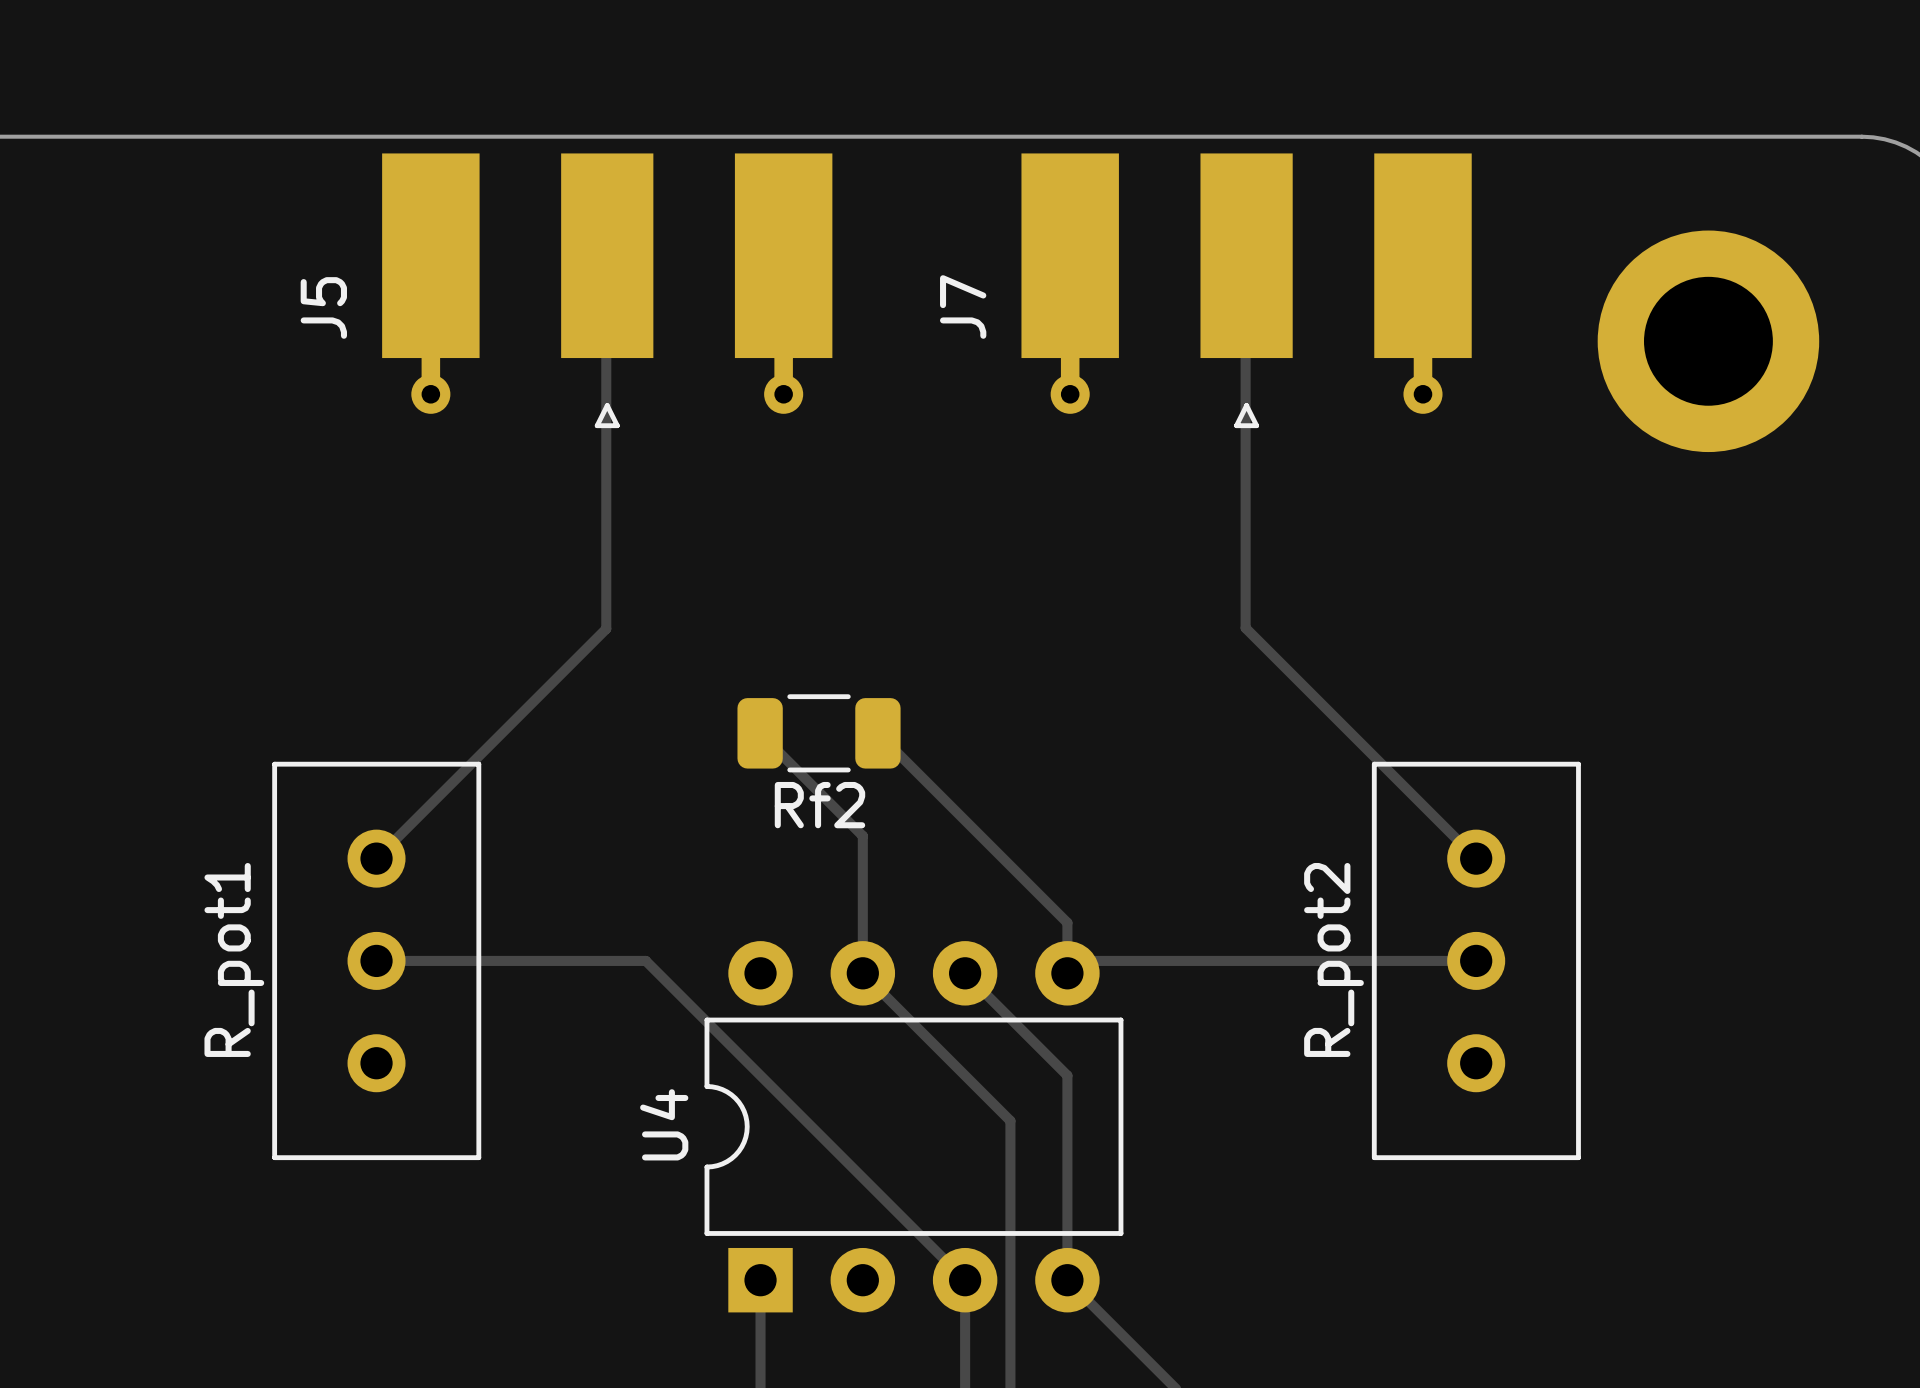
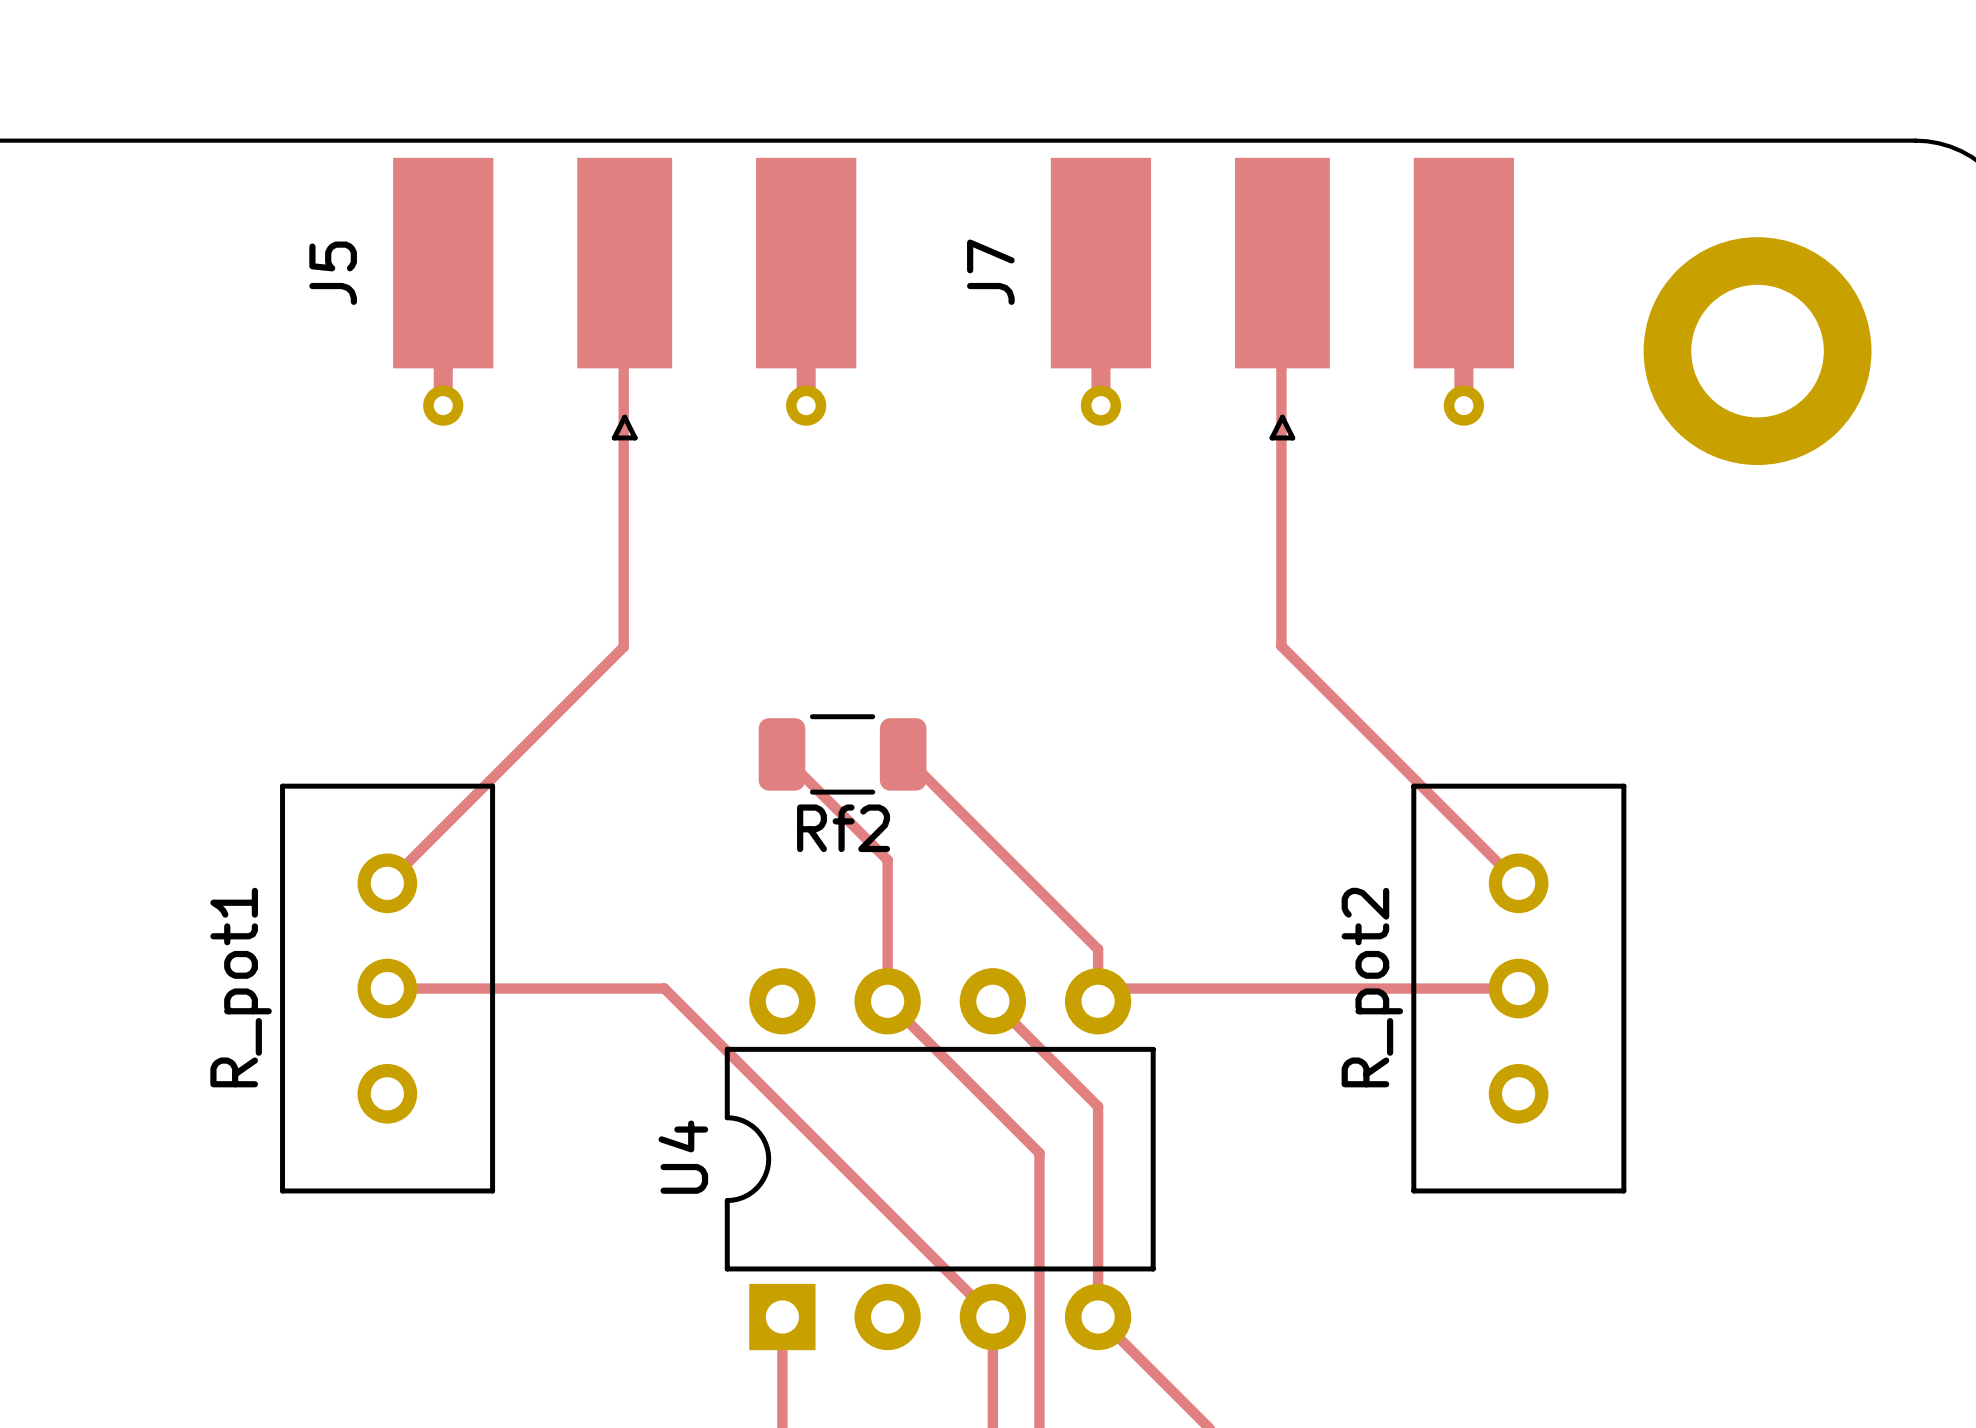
J5 name position: J5 (323, 307) -> J5 (333, 273)
J7 name position: J7 (963, 307) -> J7 (990, 272)

